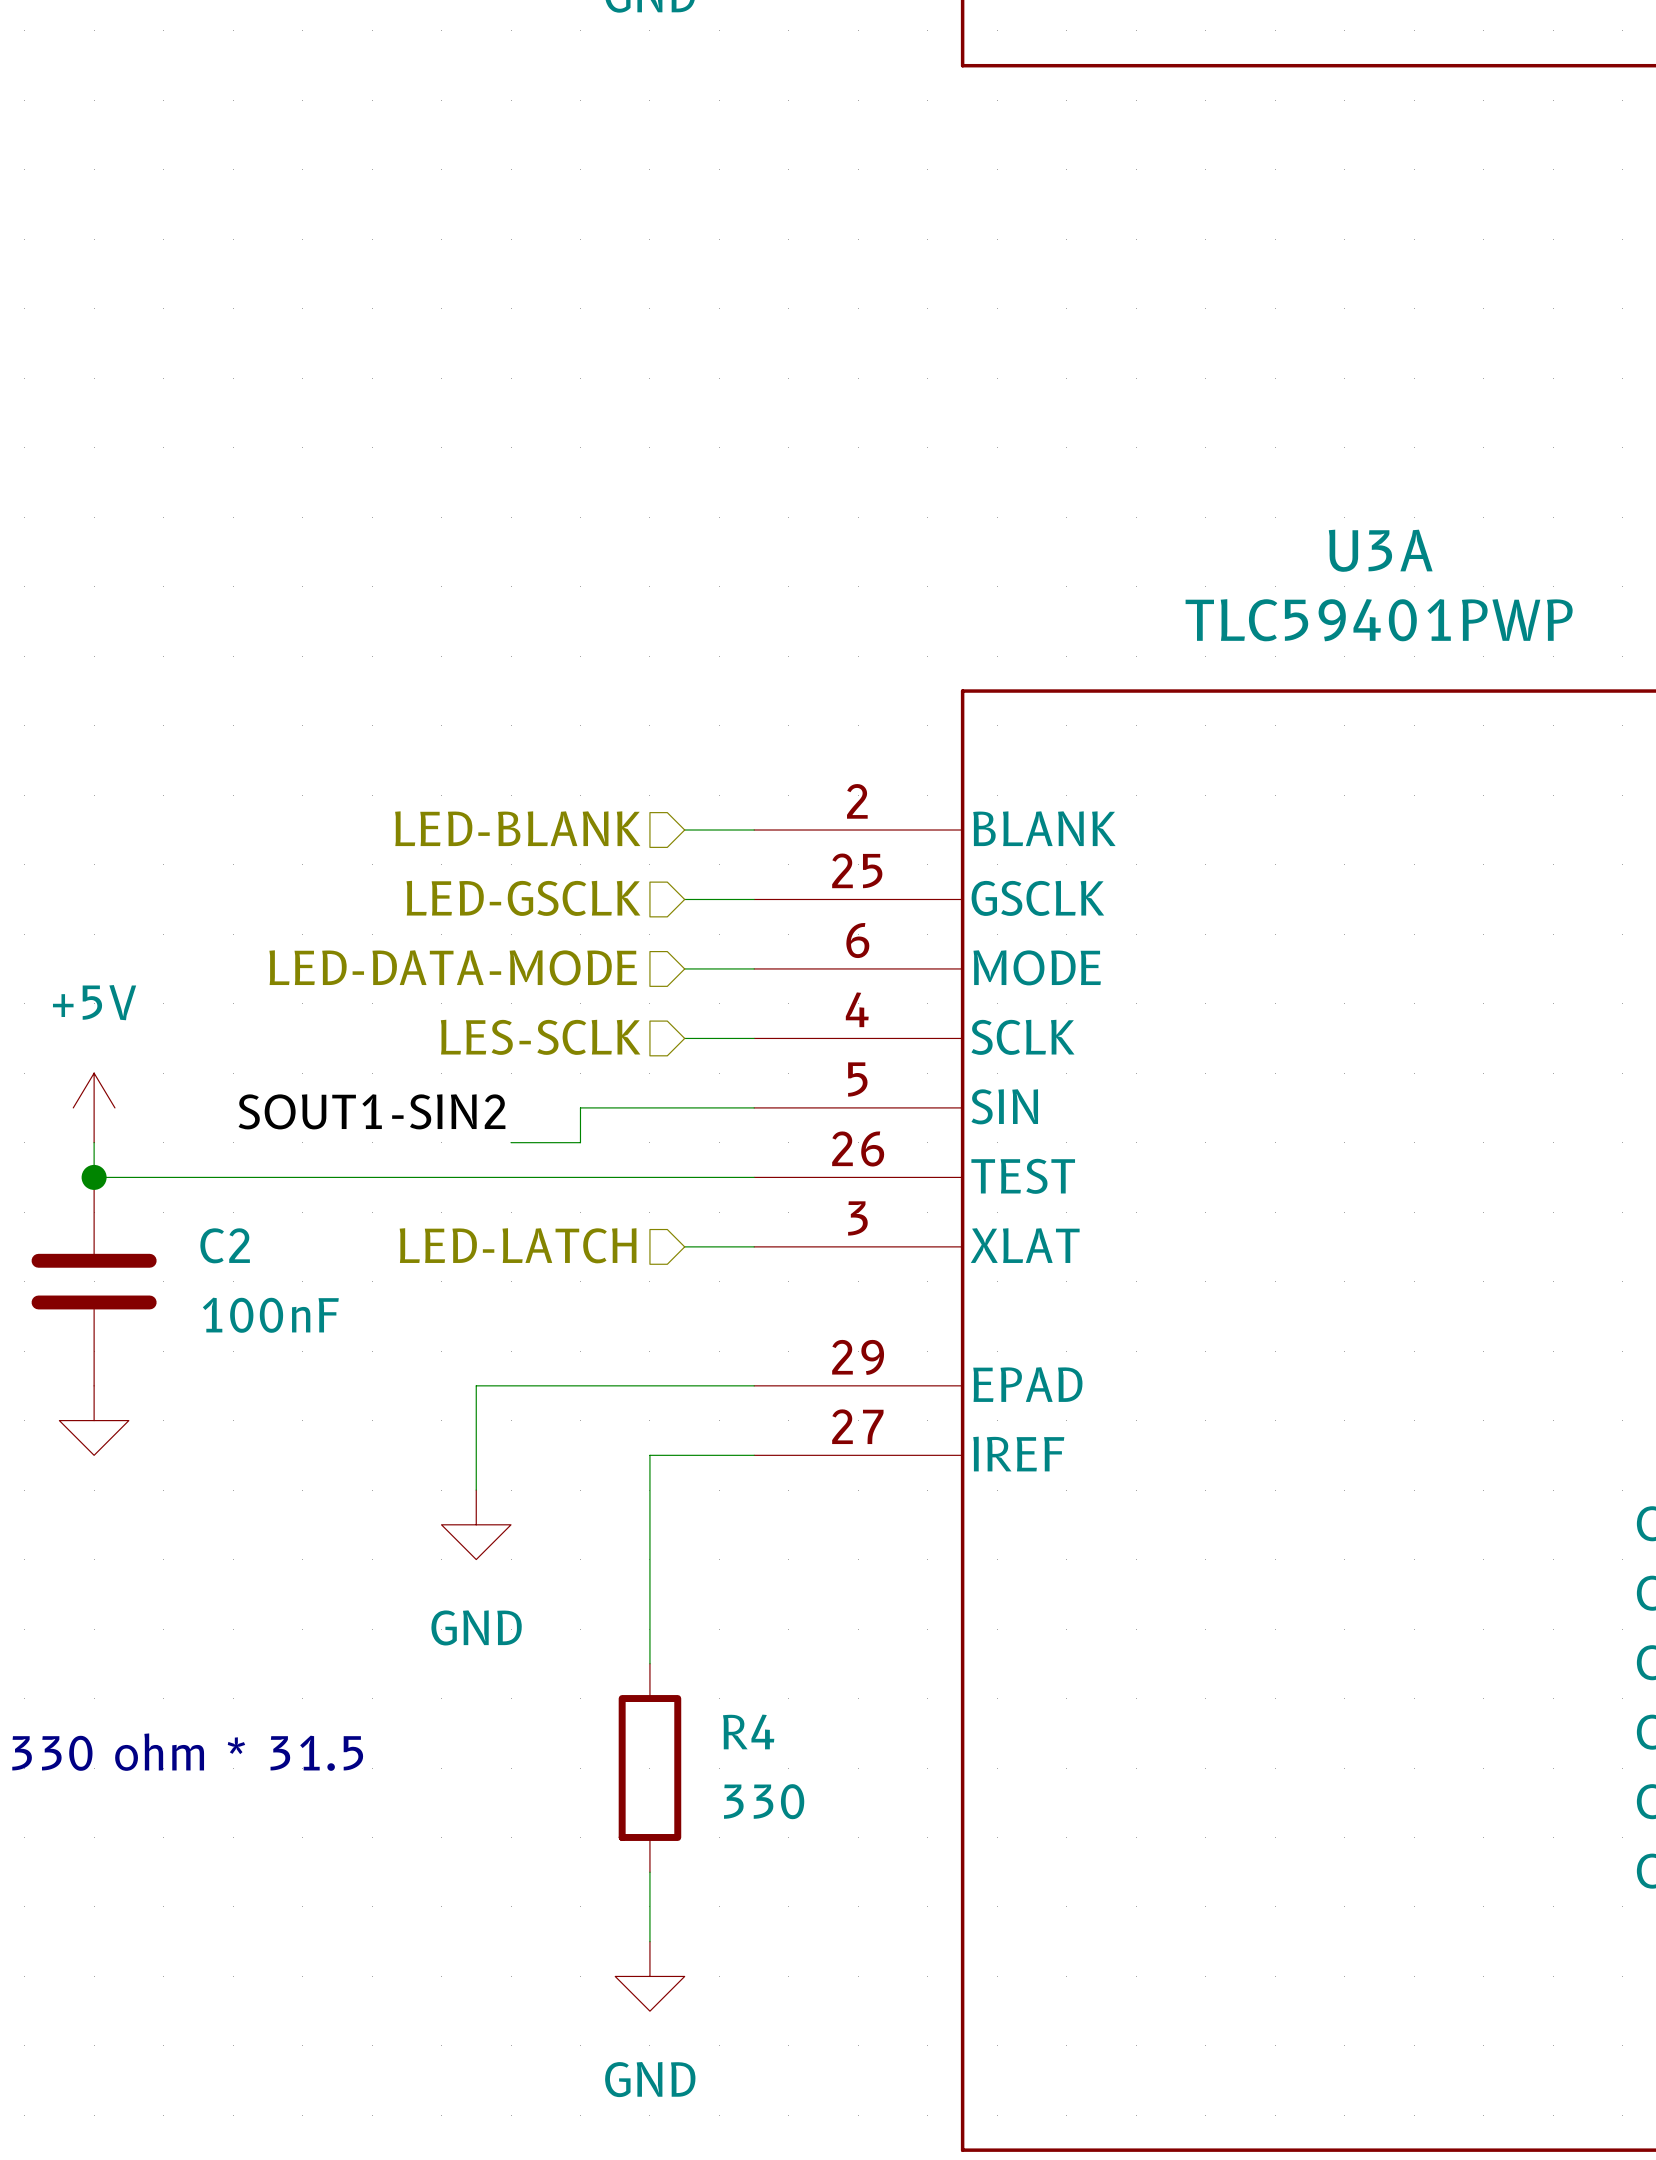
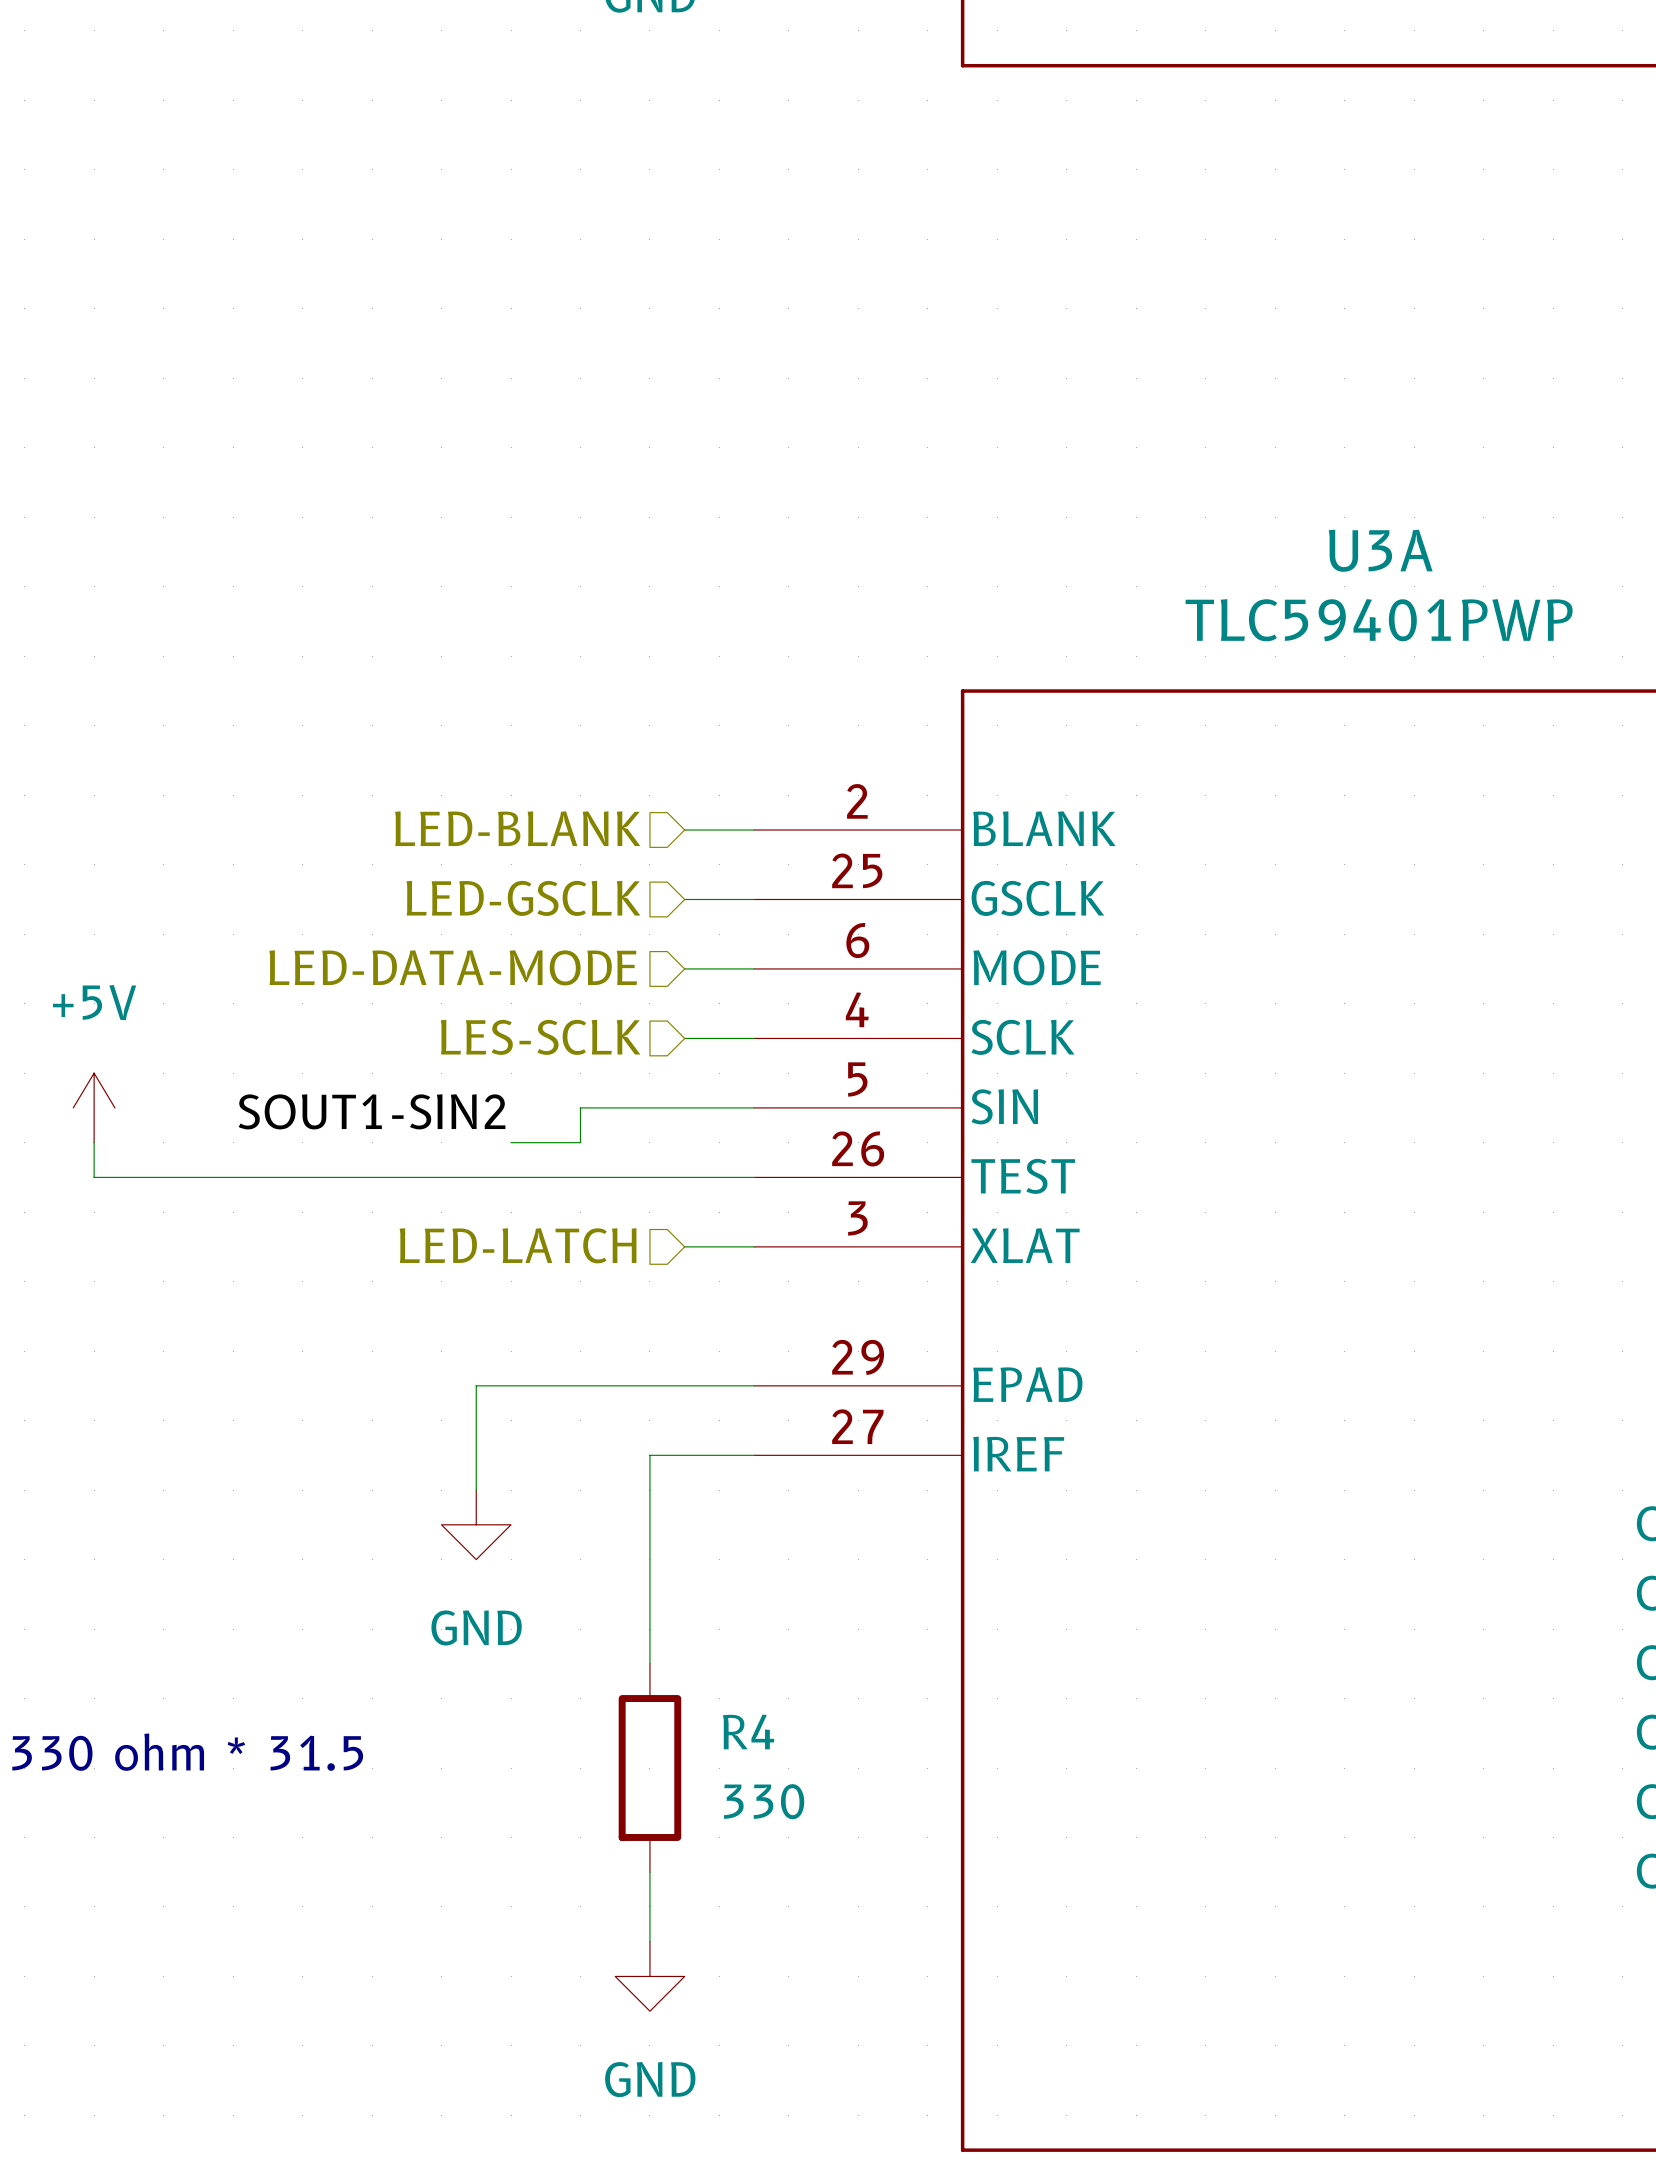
junction: (94, 1177) -> none
C2: 100nF (94, 1281) -> none
power symbol: (94, 1420) -> none

